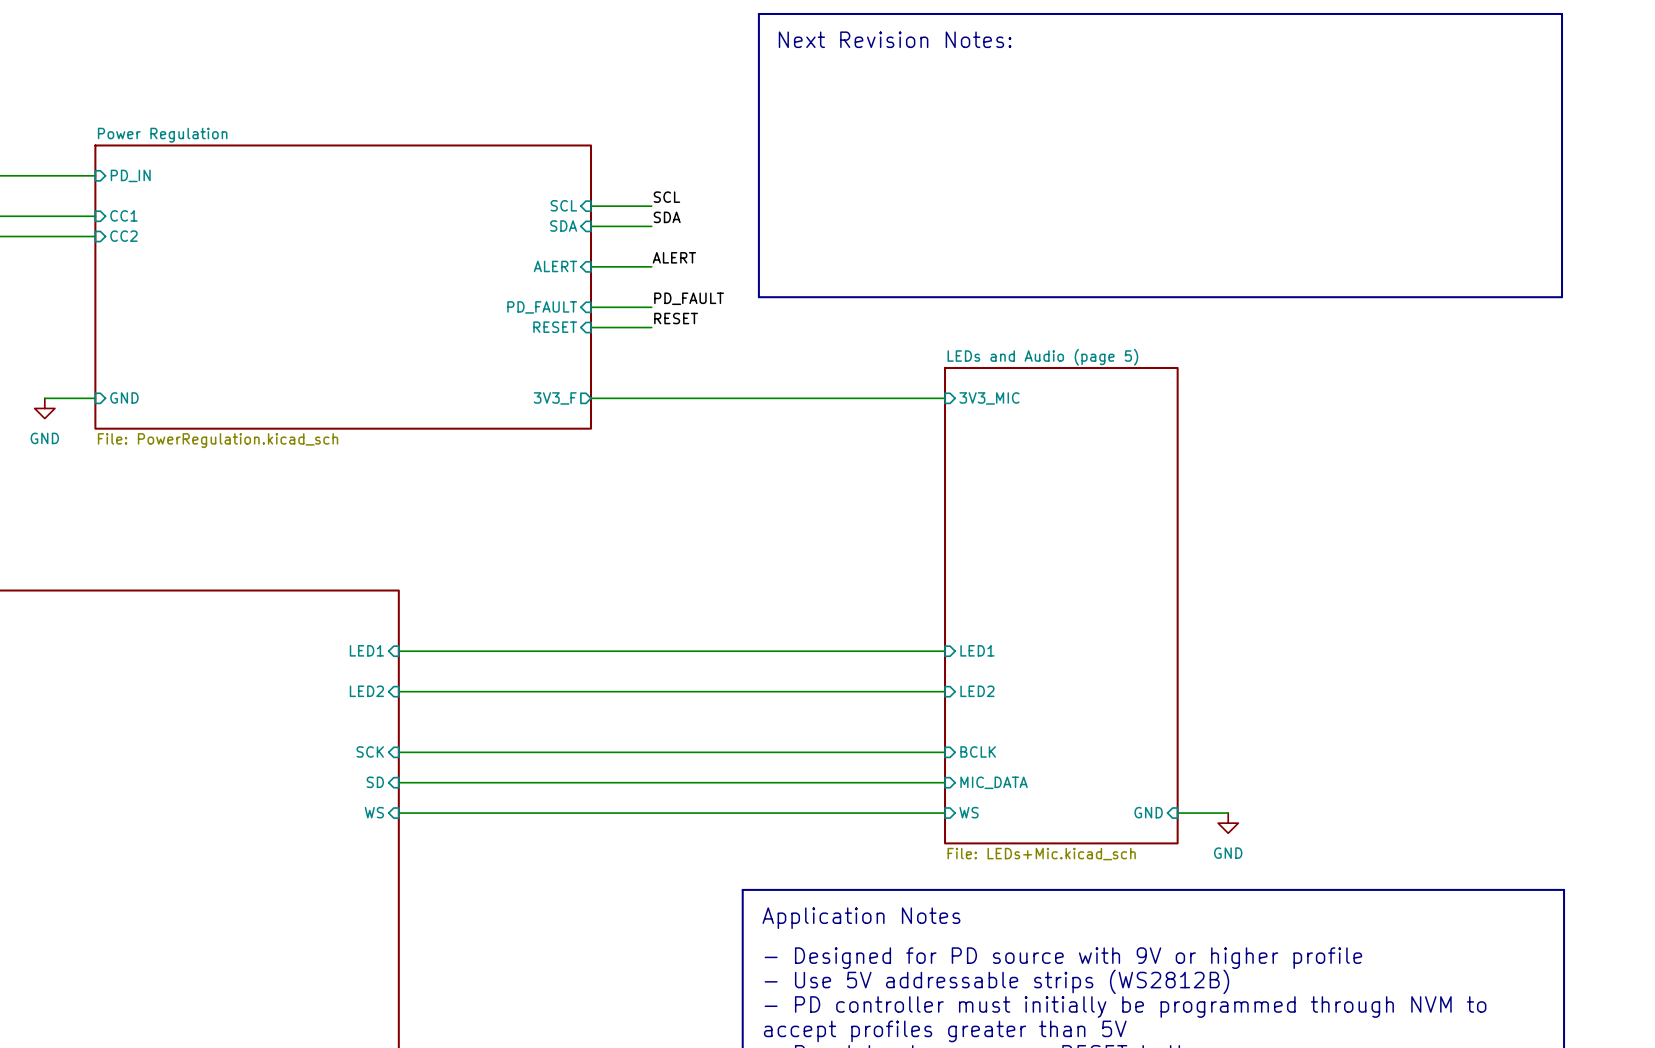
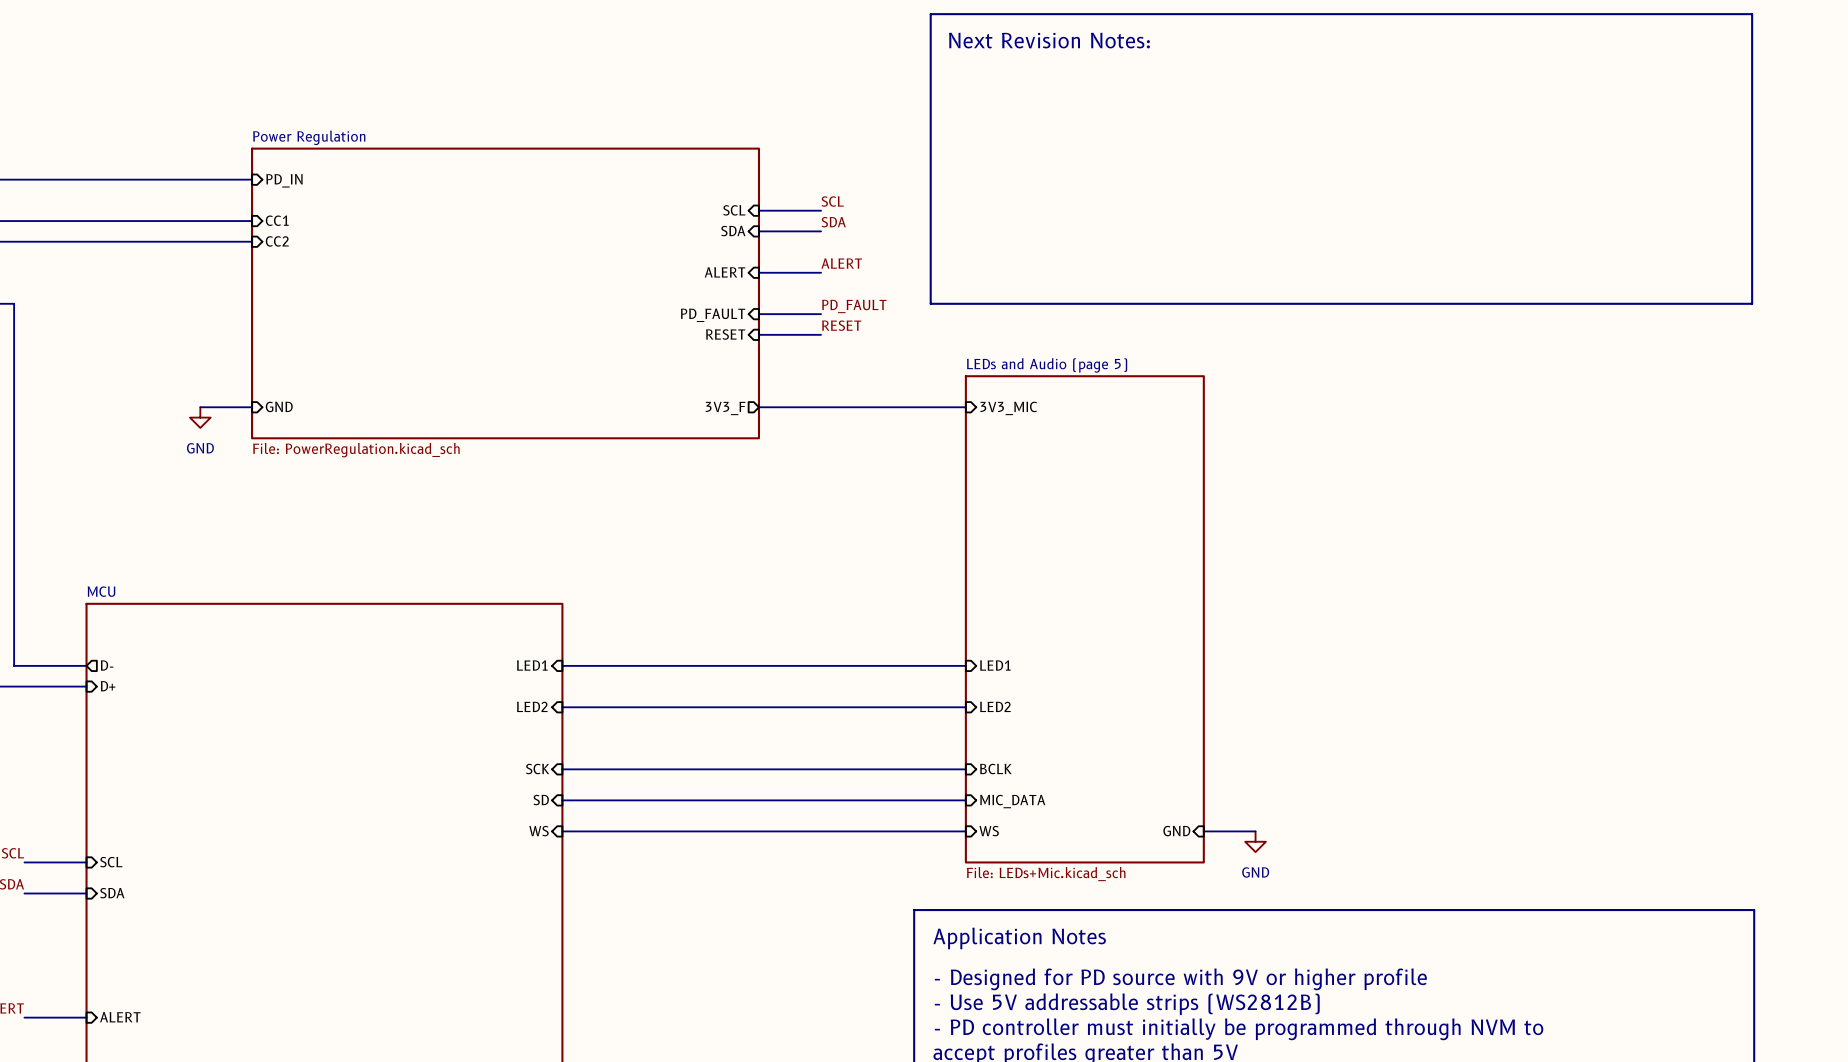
wire: (793, 398) (945, 398) -> none
sheet pin position: 3V3_MIC (989, 398) -> 3V3_MIC (1008, 408)
sheet LEDs and Audio (page 5) position: (1061, 605) -> (1084, 619)
sheet pin position: LED1 (977, 650) -> LED1 (995, 665)
wire: (793, 651) (945, 651) -> none
wire: (793, 691) (945, 691) -> none
sheet pin position: LED2 (977, 691) -> LED2 (995, 706)
sheet pin position: BCLK (978, 751) -> BCLK (995, 769)
wire: (793, 752) (945, 752) -> none
wire: (793, 782) (945, 782) -> none
sheet pin position: MIC_DATA (994, 782) -> MIC_DATA (1012, 801)
sheet pin position: WS (969, 812) -> WS (989, 831)
sheet pin position: GND (1148, 812) -> GND (1176, 831)
wire: (793, 813) (945, 813) -> none
wire: (1177, 813) (1228, 813) -> (1203, 831) (1255, 831)
power symbol position: GND (1228, 823) -> GND (1255, 841)

